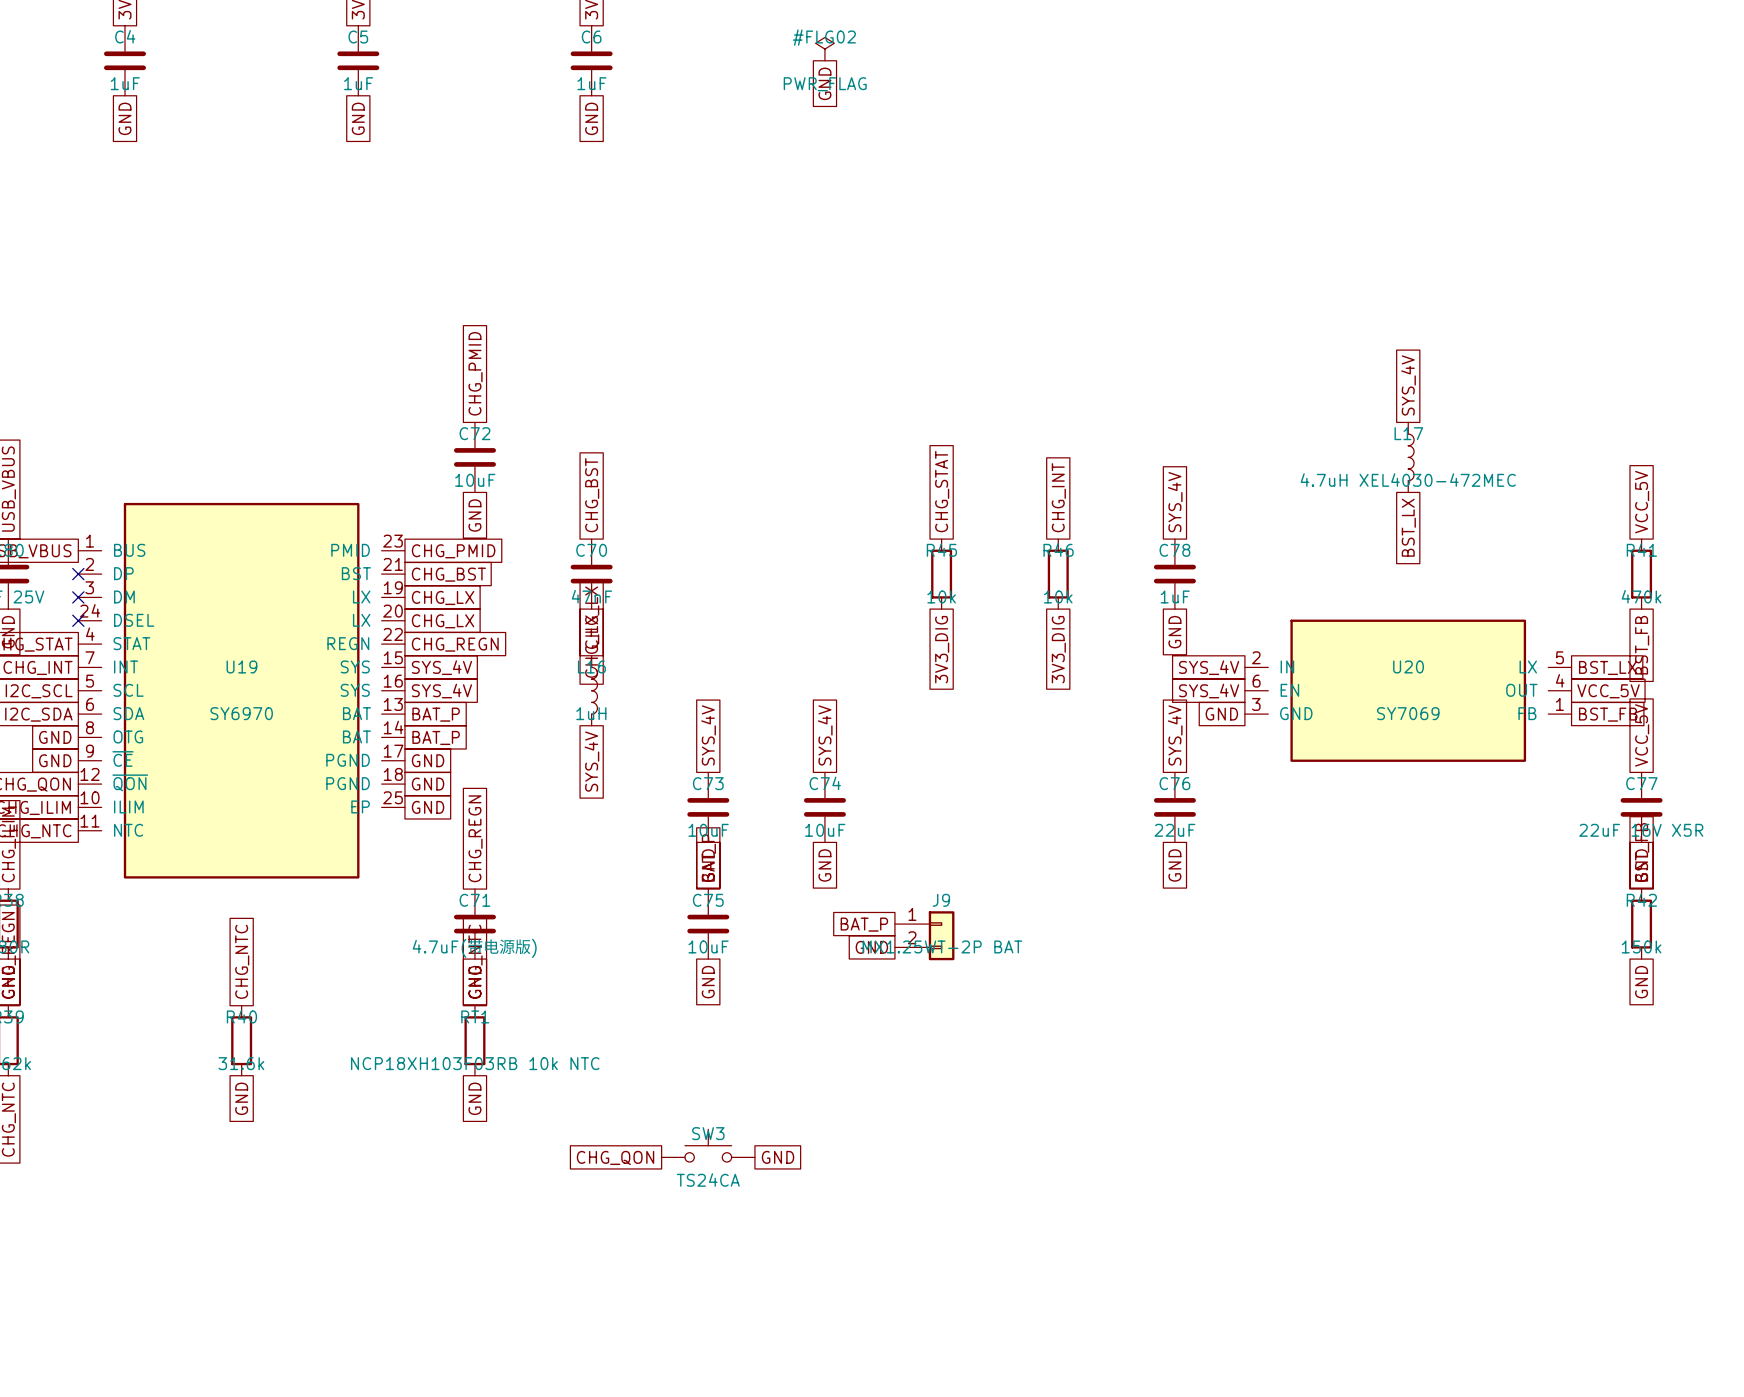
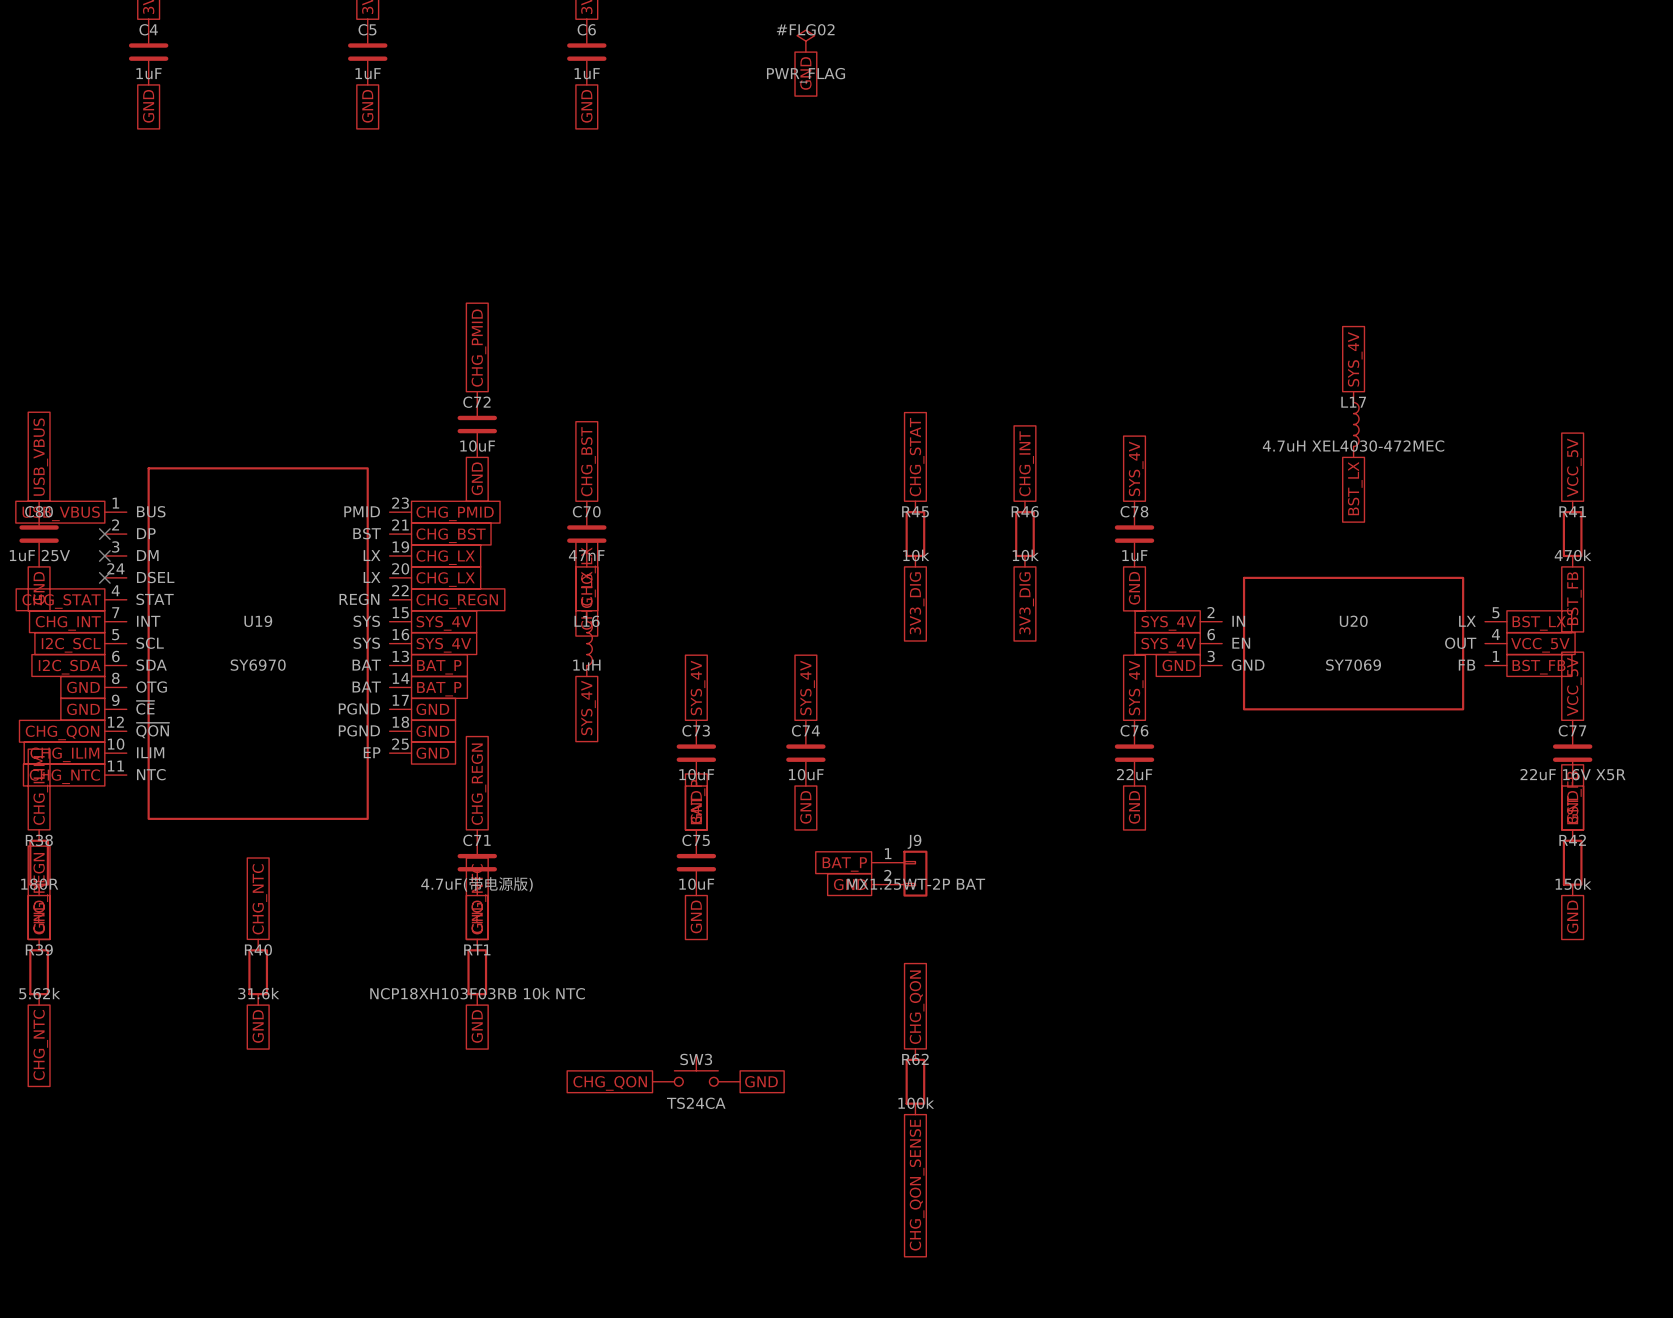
global label: none -> CHG_QON (917, 1007)
R62: none -> 100k (915, 1081)
global label: none -> CHG_QON_SENSE (917, 1185)

